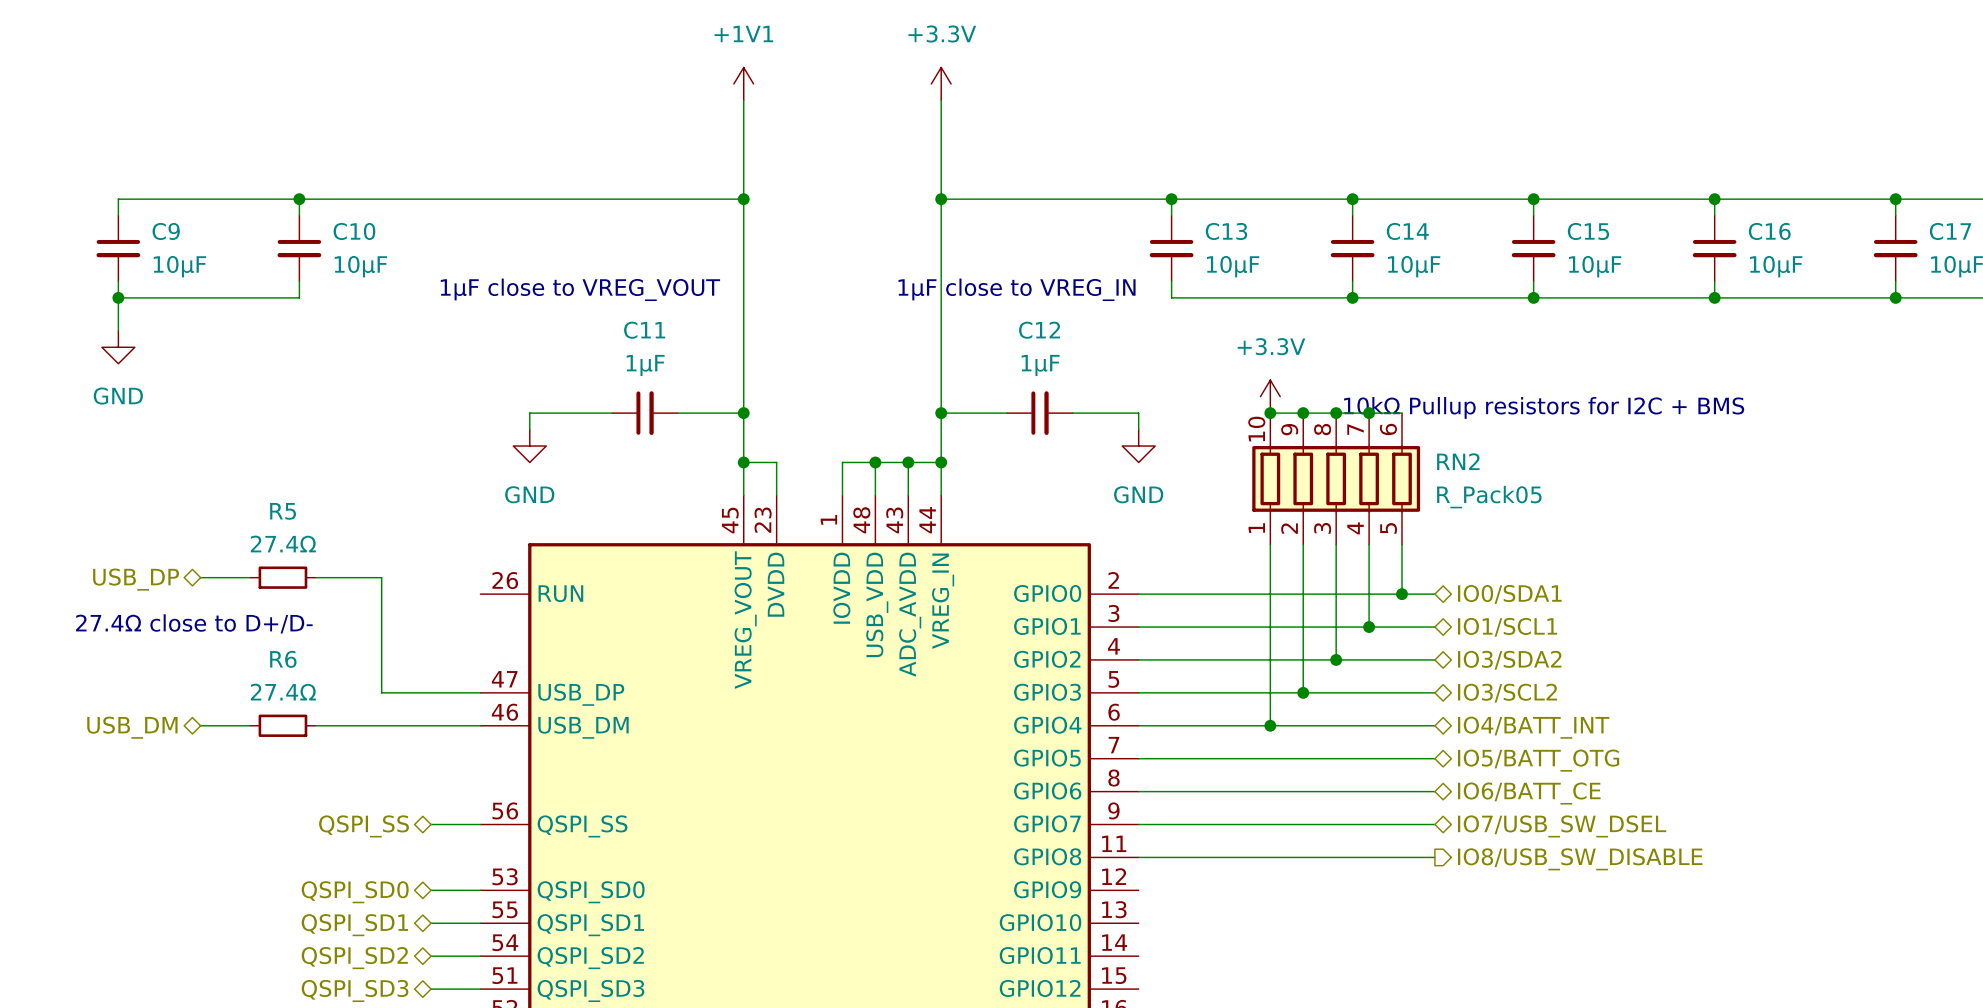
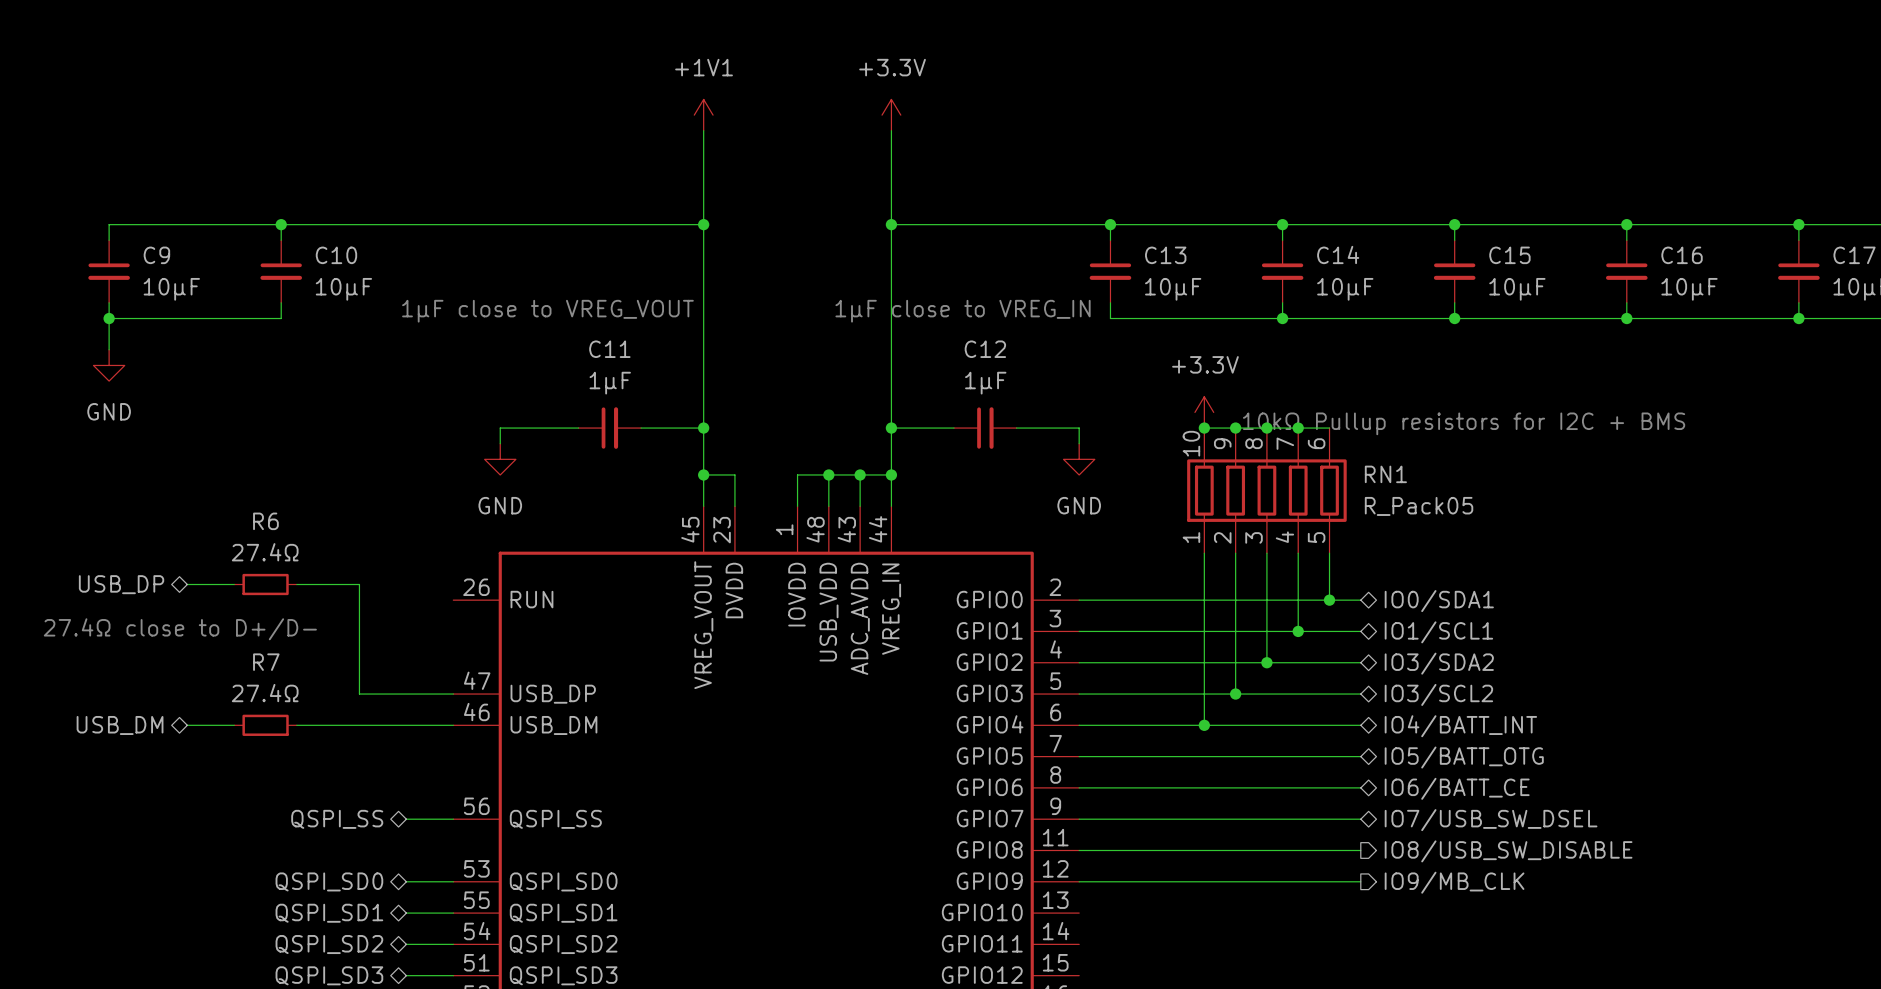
RN2 name: RN2 (1458, 461) -> RN1 (1385, 474)
R5 name: R5 (283, 511) -> R6 (265, 521)
R6 name: R6 (283, 659) -> R7 (266, 662)
wire: none -> (1079, 881) (1360, 881)
hierarchical label: none -> IO9/MB_CLK (1454, 882)

